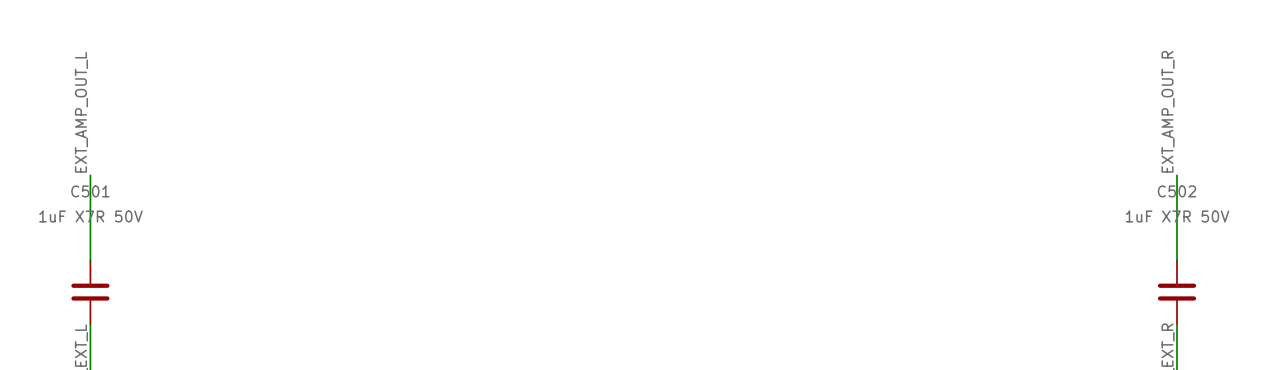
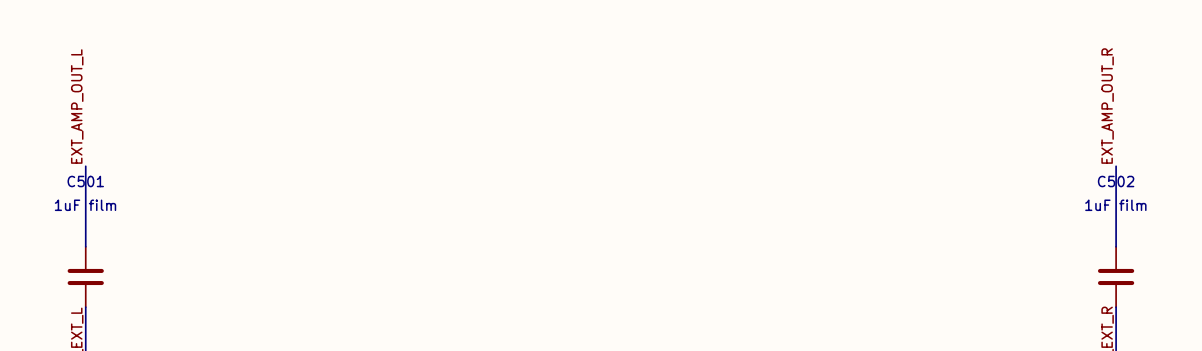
C501 value: 1uF X7R 50V (90, 216) -> 1uF film (85, 205)
C502 value: 1uF X7R 50V (1177, 216) -> 1uF film (1115, 205)

